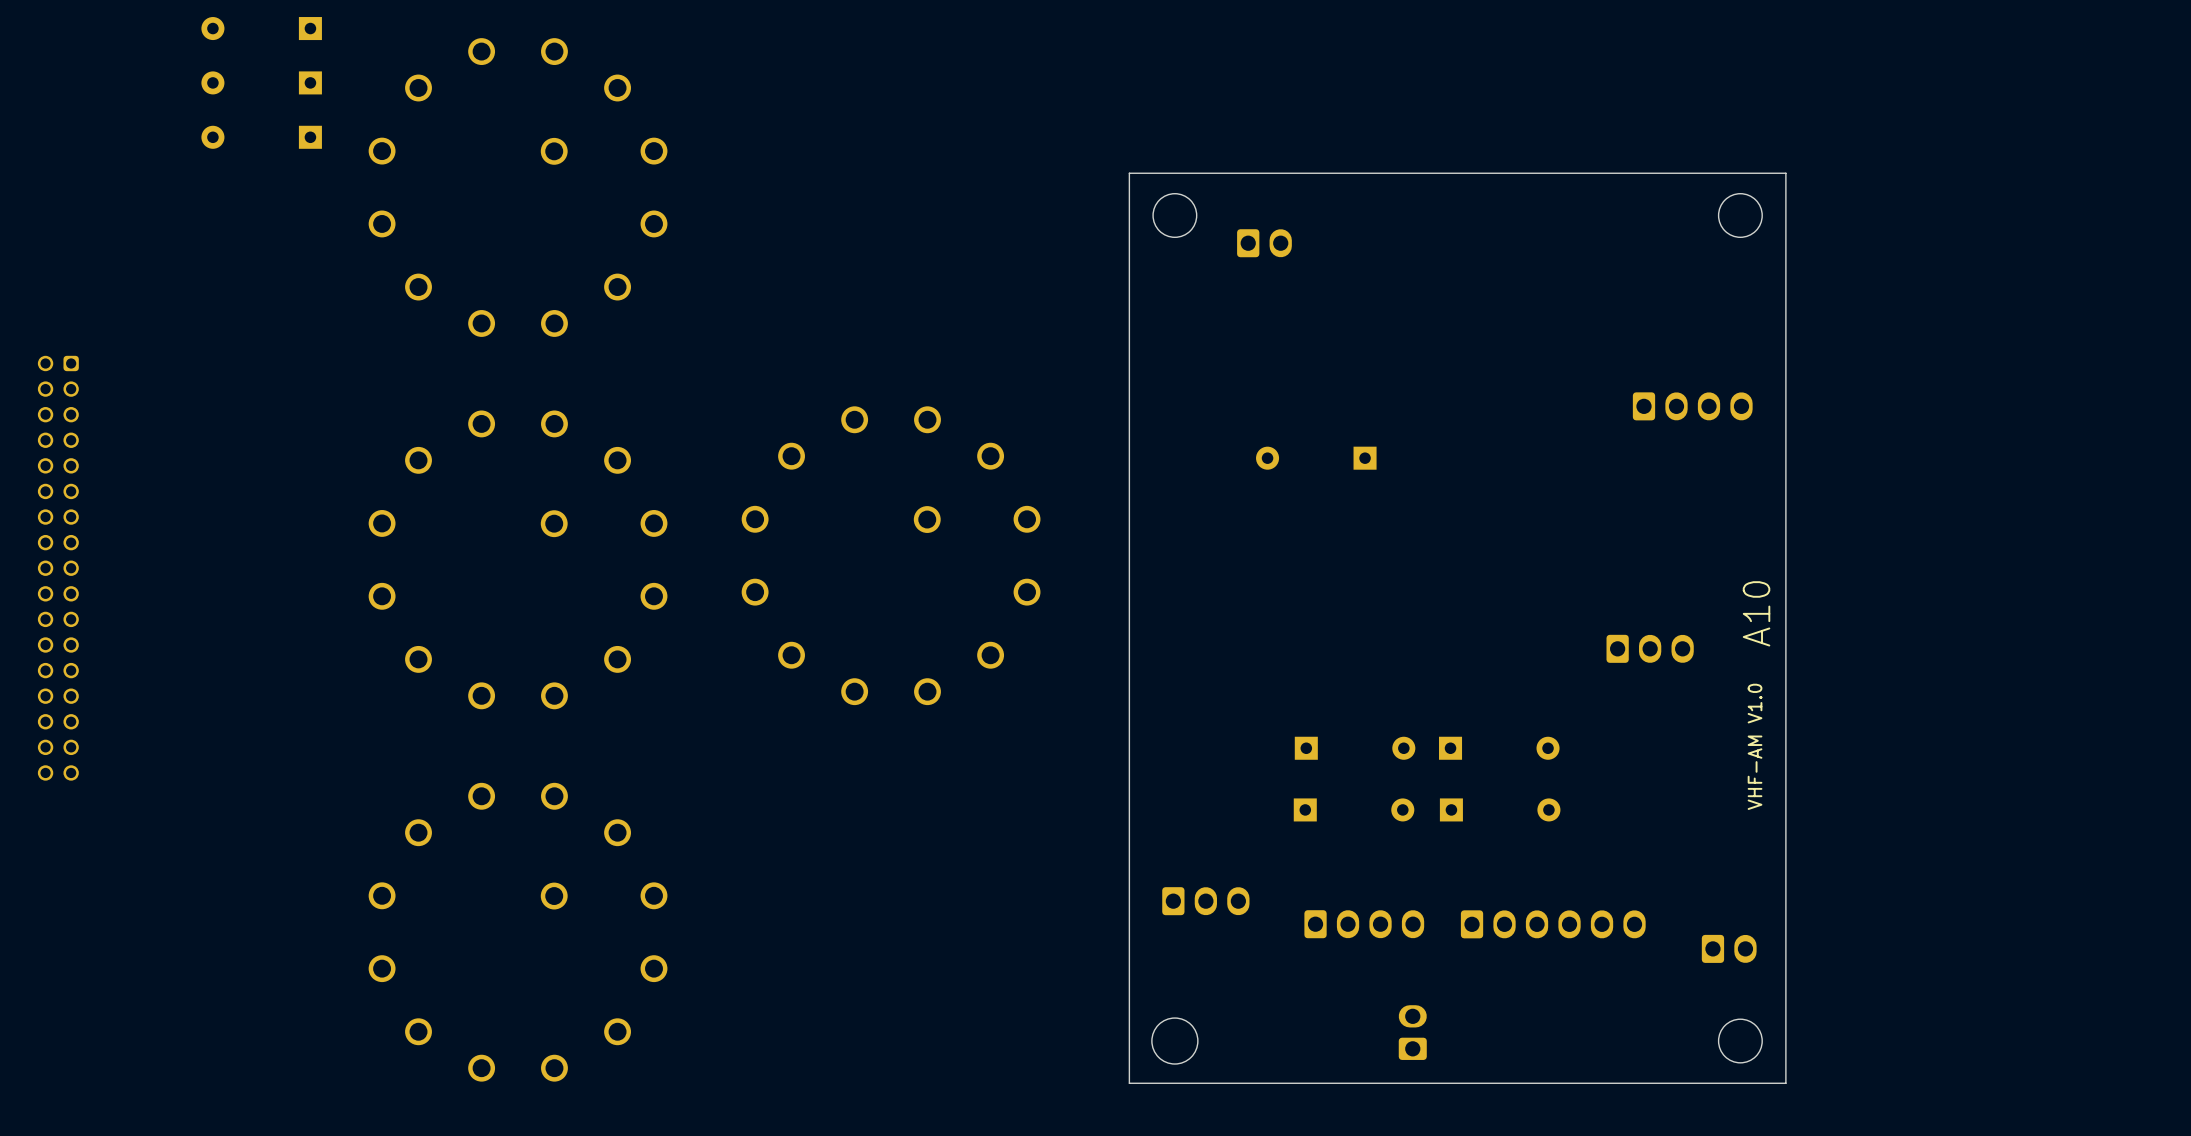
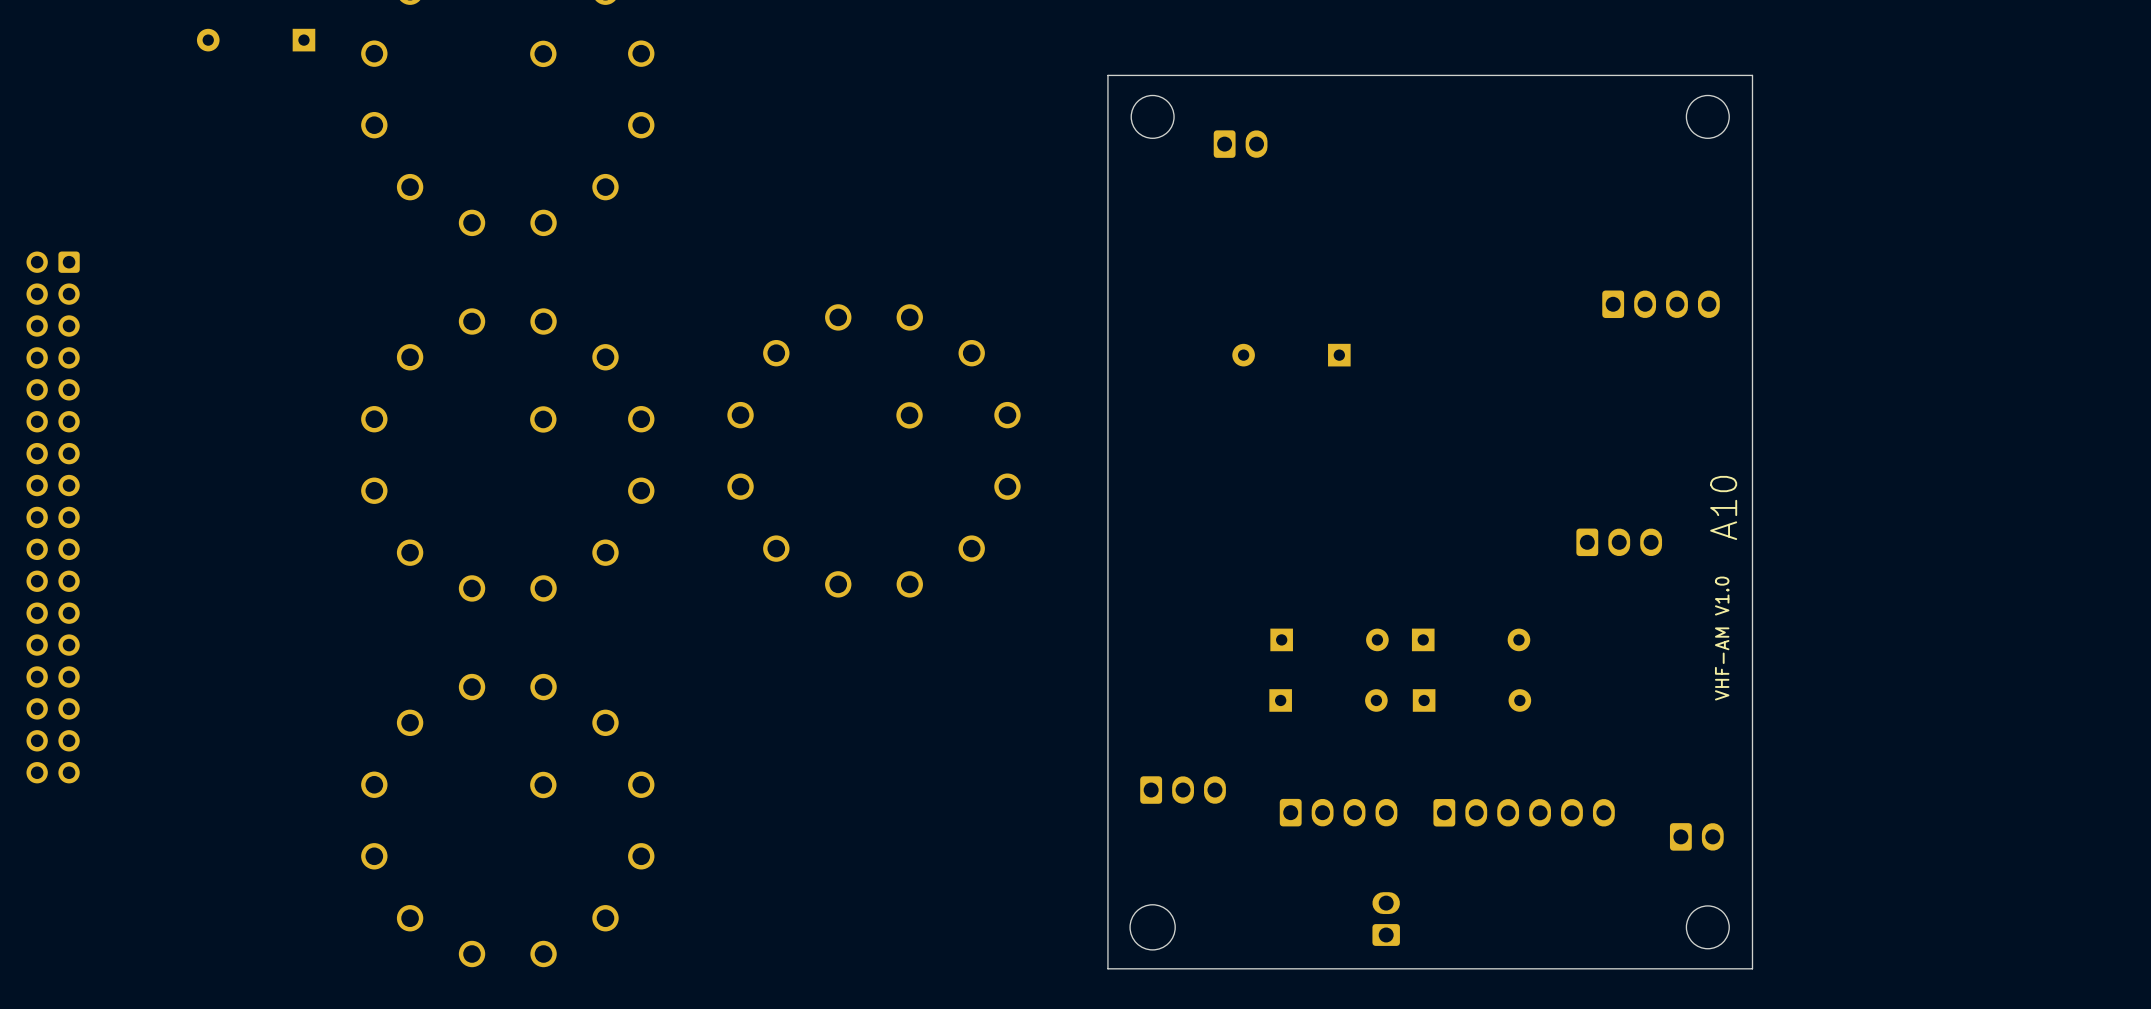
part: (58, 568) -> none
part: none -> (53, 517)

